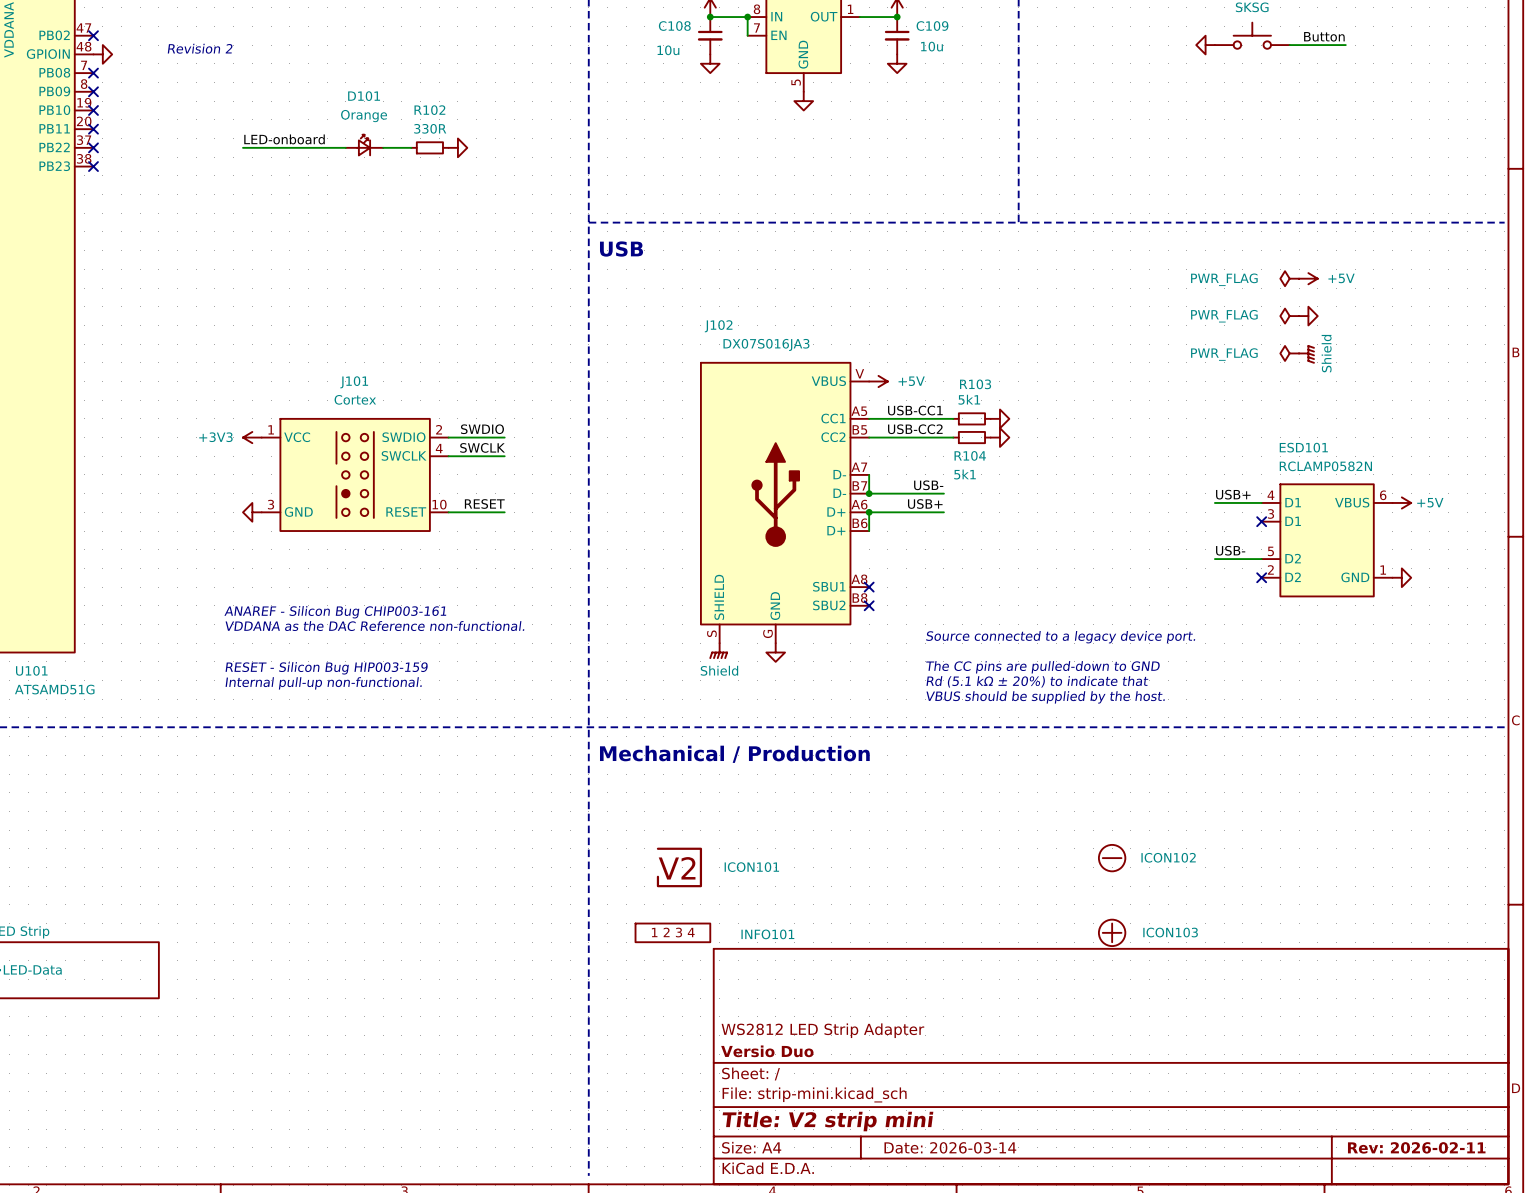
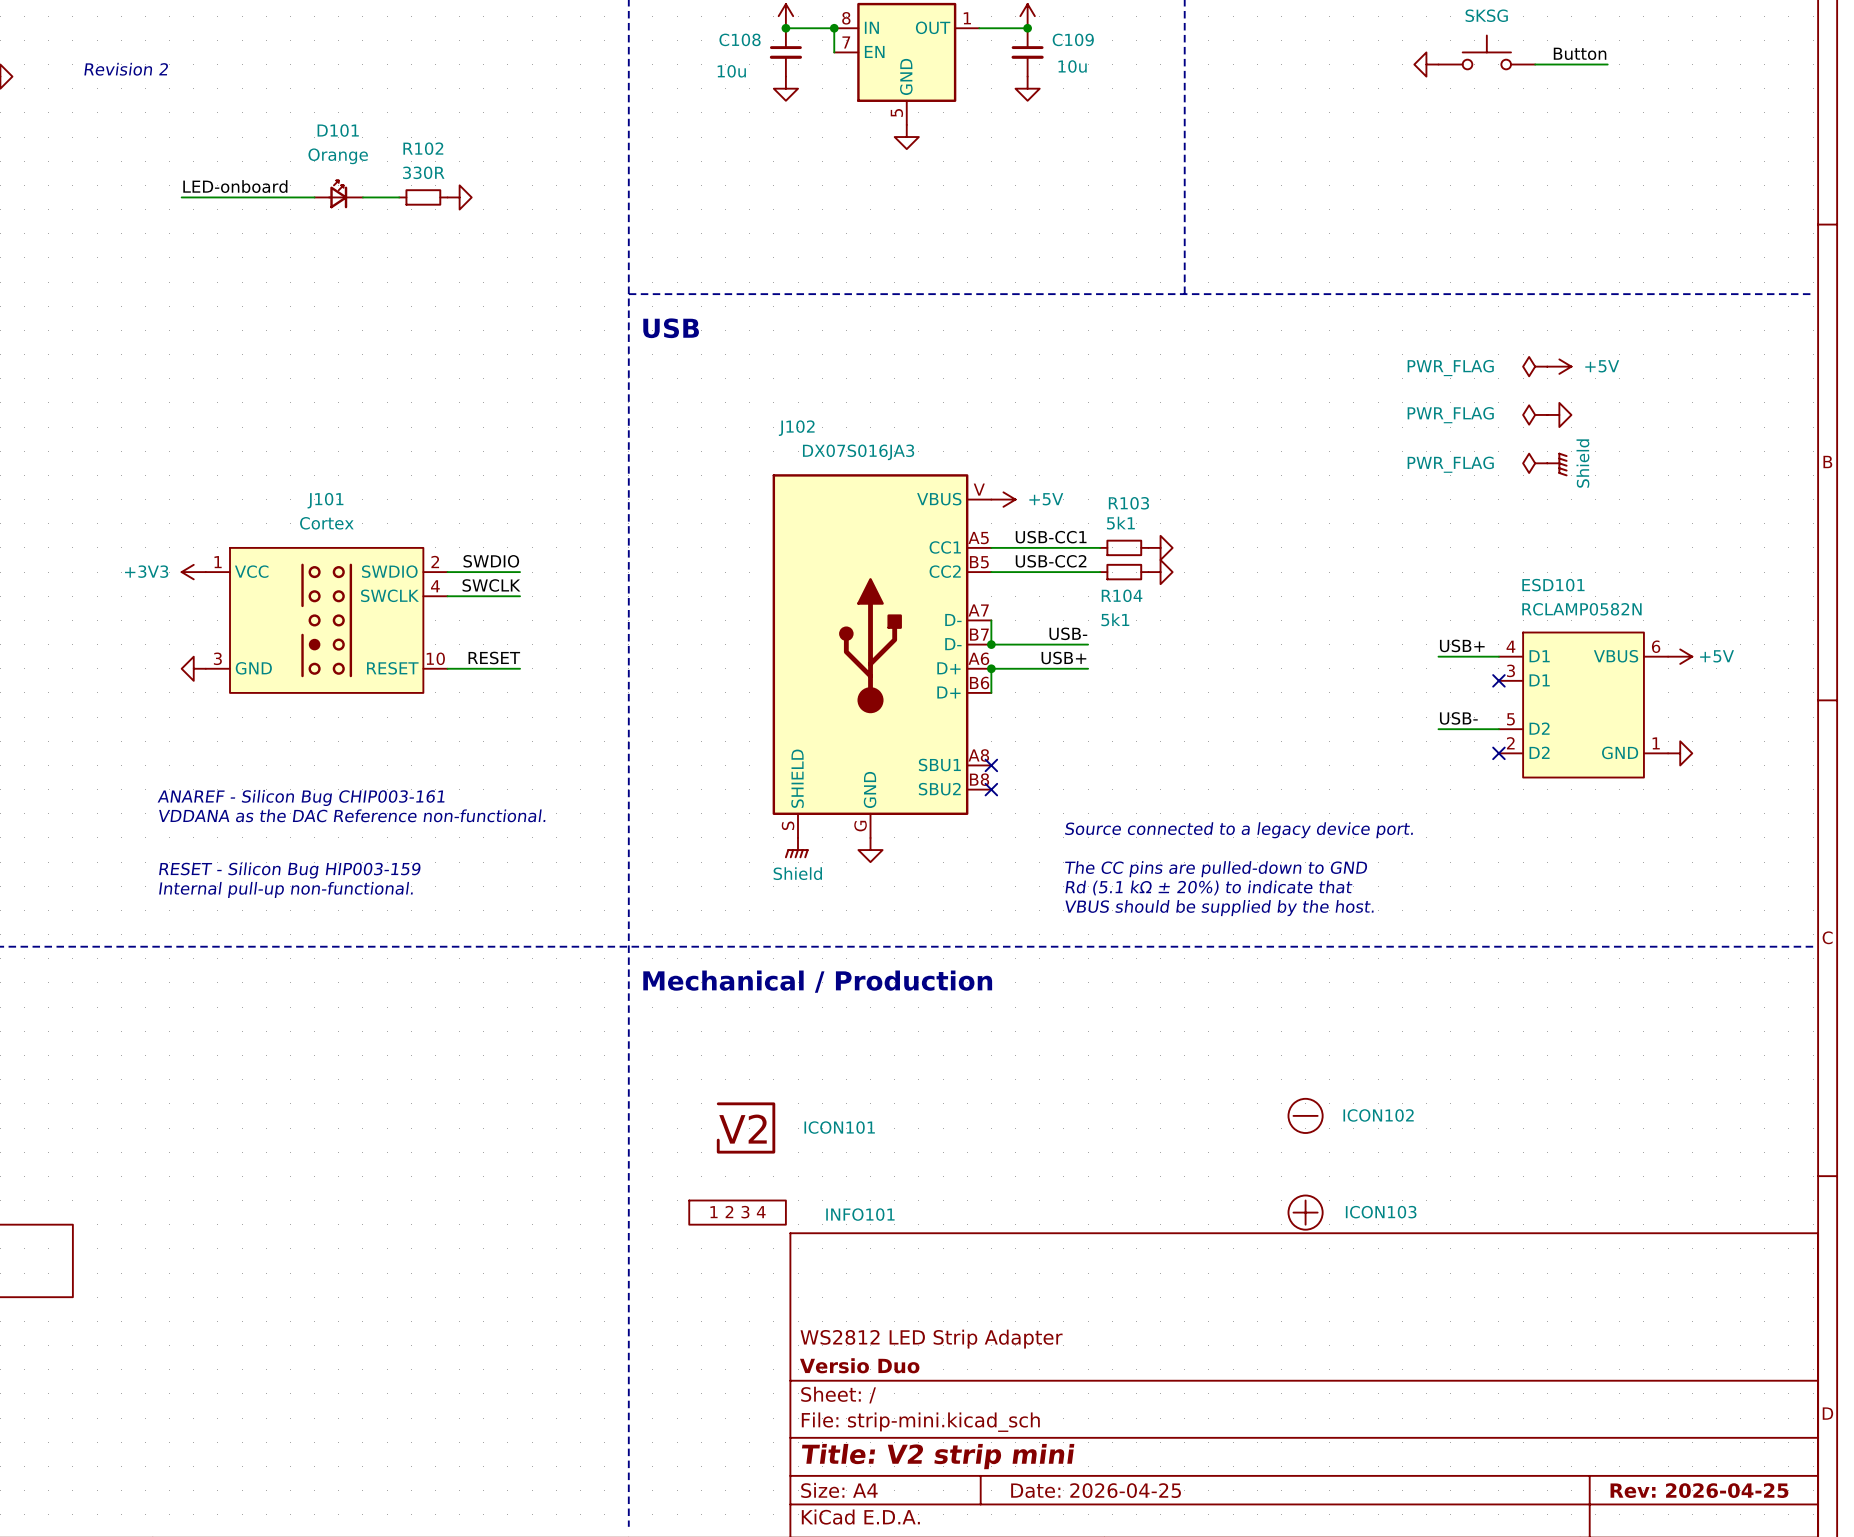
title block: Date: 2026-03-14 (950, 1147) -> Date: 2026-04-25 (1096, 1490)
title block: Rev: 2026-02-11 (1416, 1147) -> Rev: 2026-04-25 (1699, 1490)

